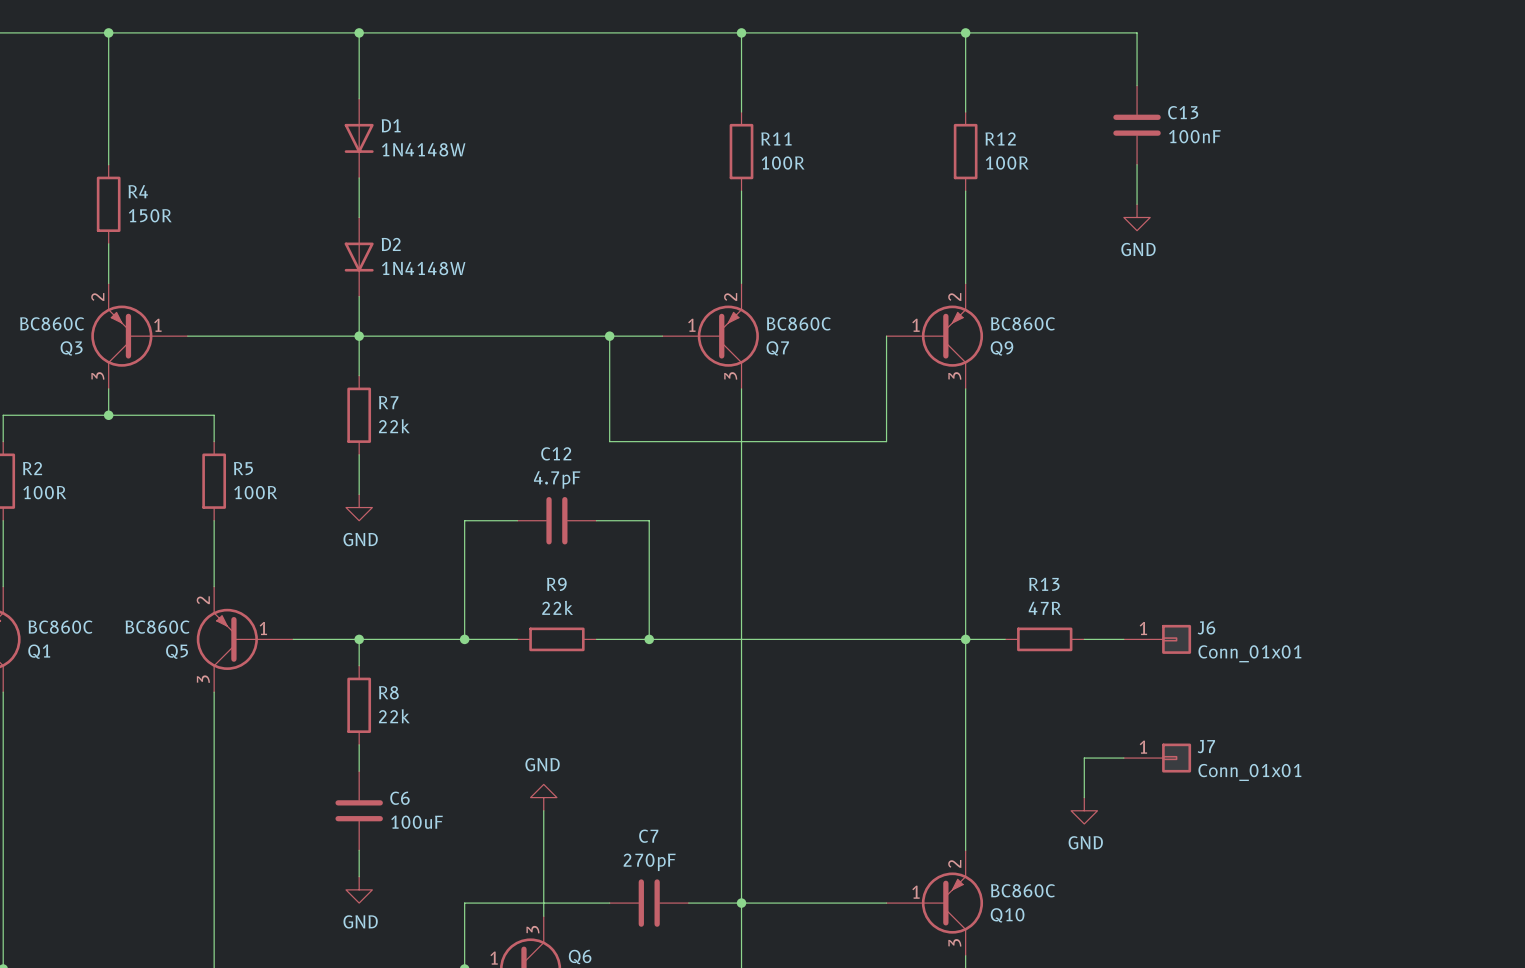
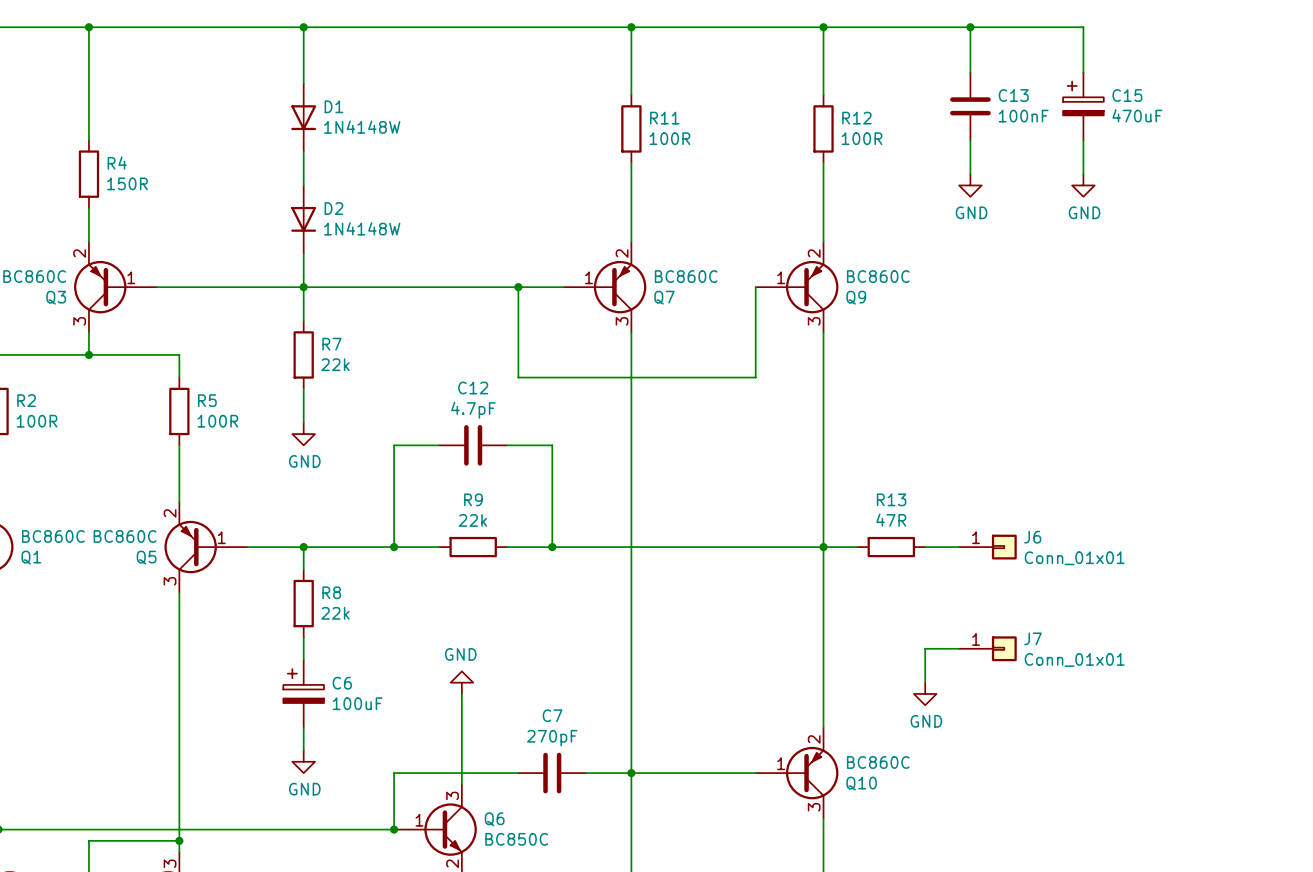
wire: none -> (970, 27) (1083, 27) (1083, 72)
junction: none -> (970, 27)
C15: none -> 470uF (1083, 106)
wire: none -> (1083, 140) (1083, 174)
power symbol: none -> GND (1083, 185)
C6 symbol: [335, 771, 383, 851] -> [283, 660, 325, 728]

